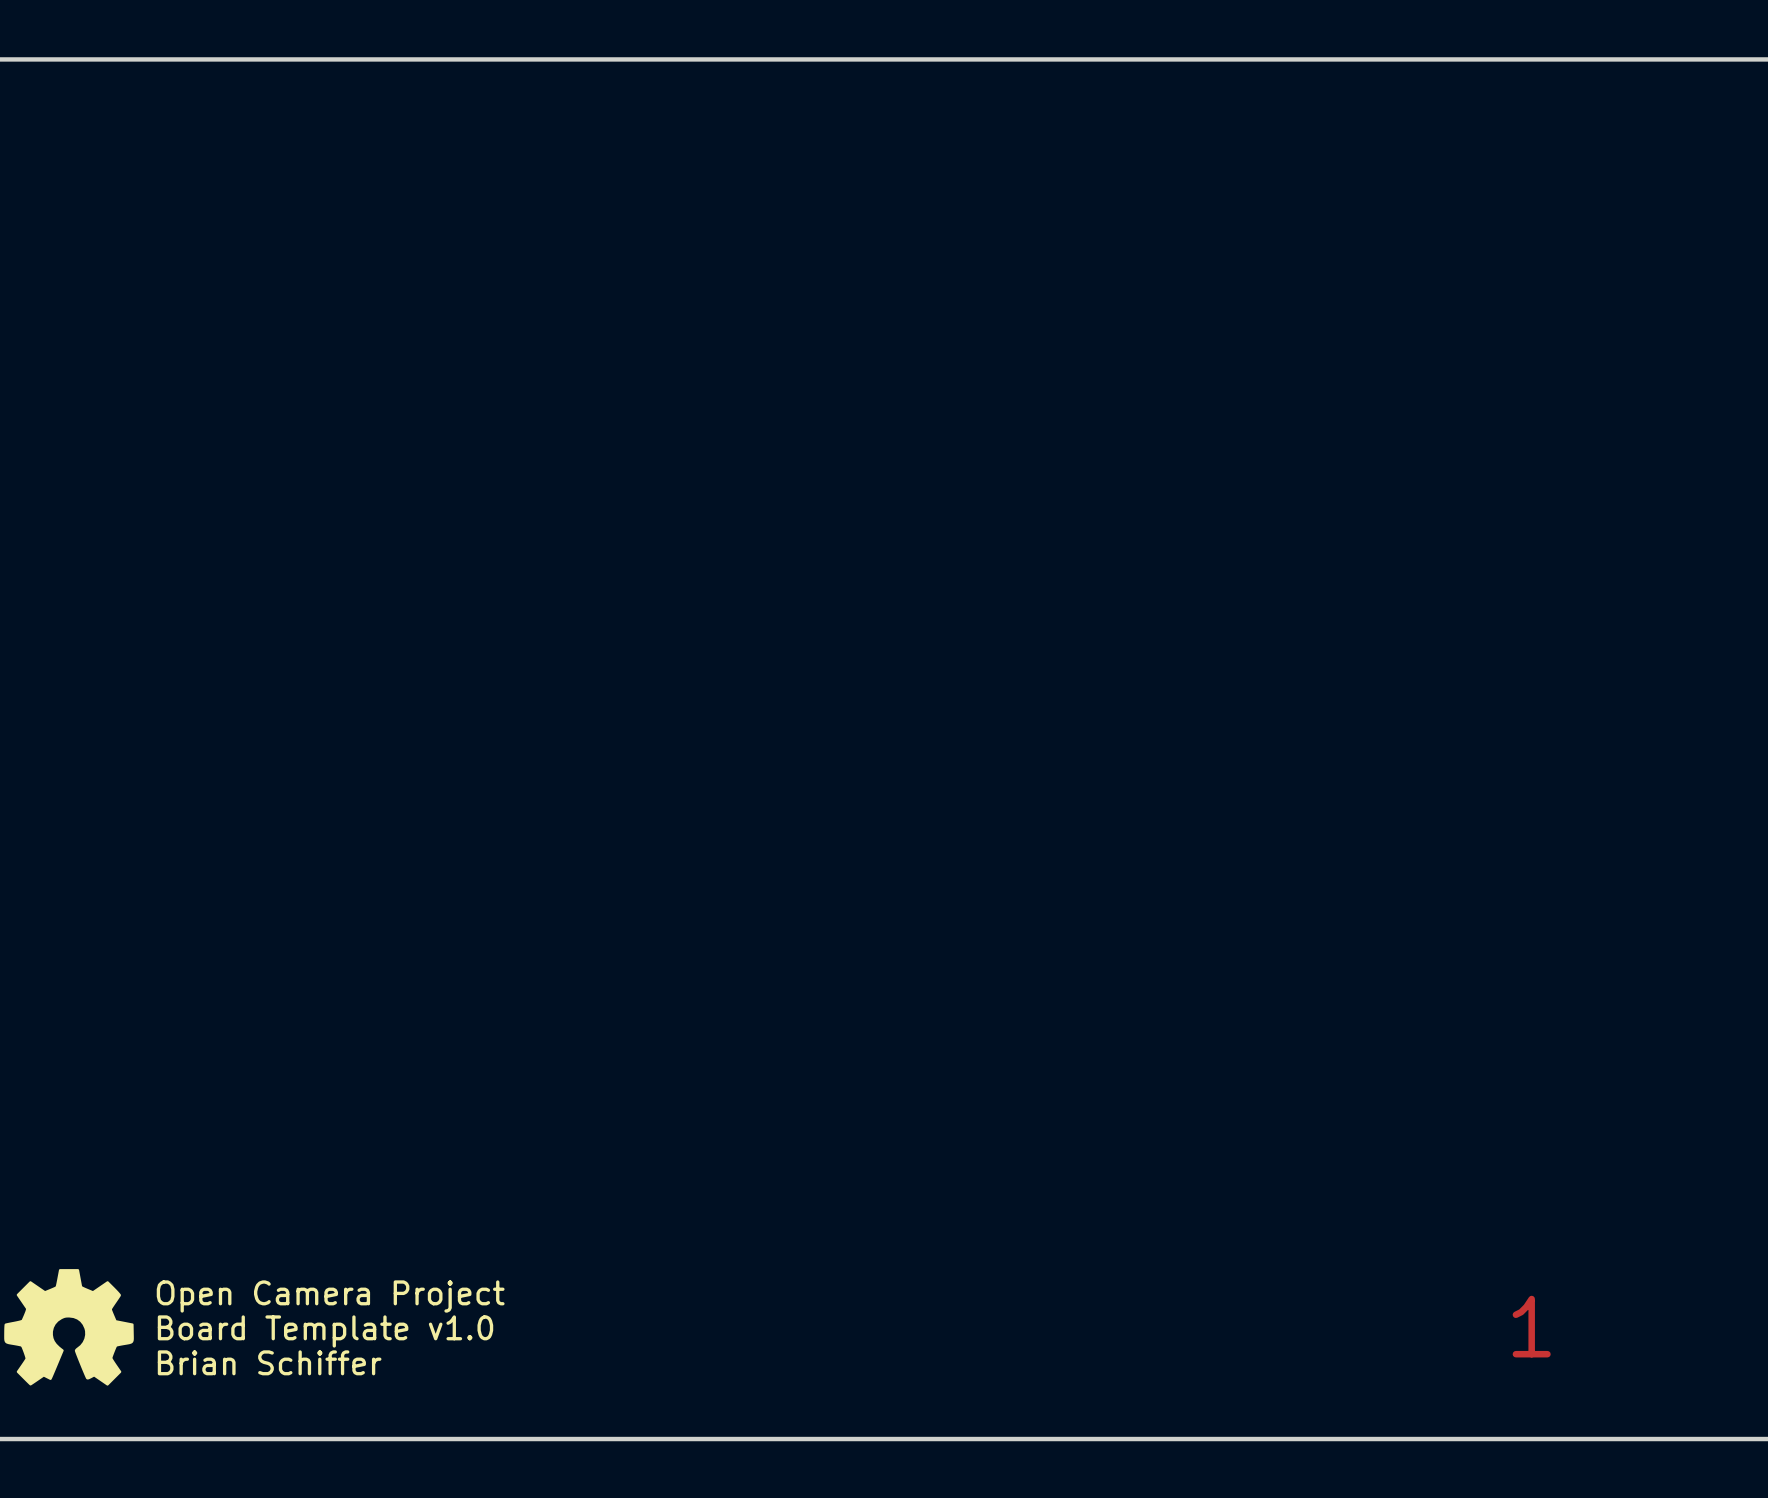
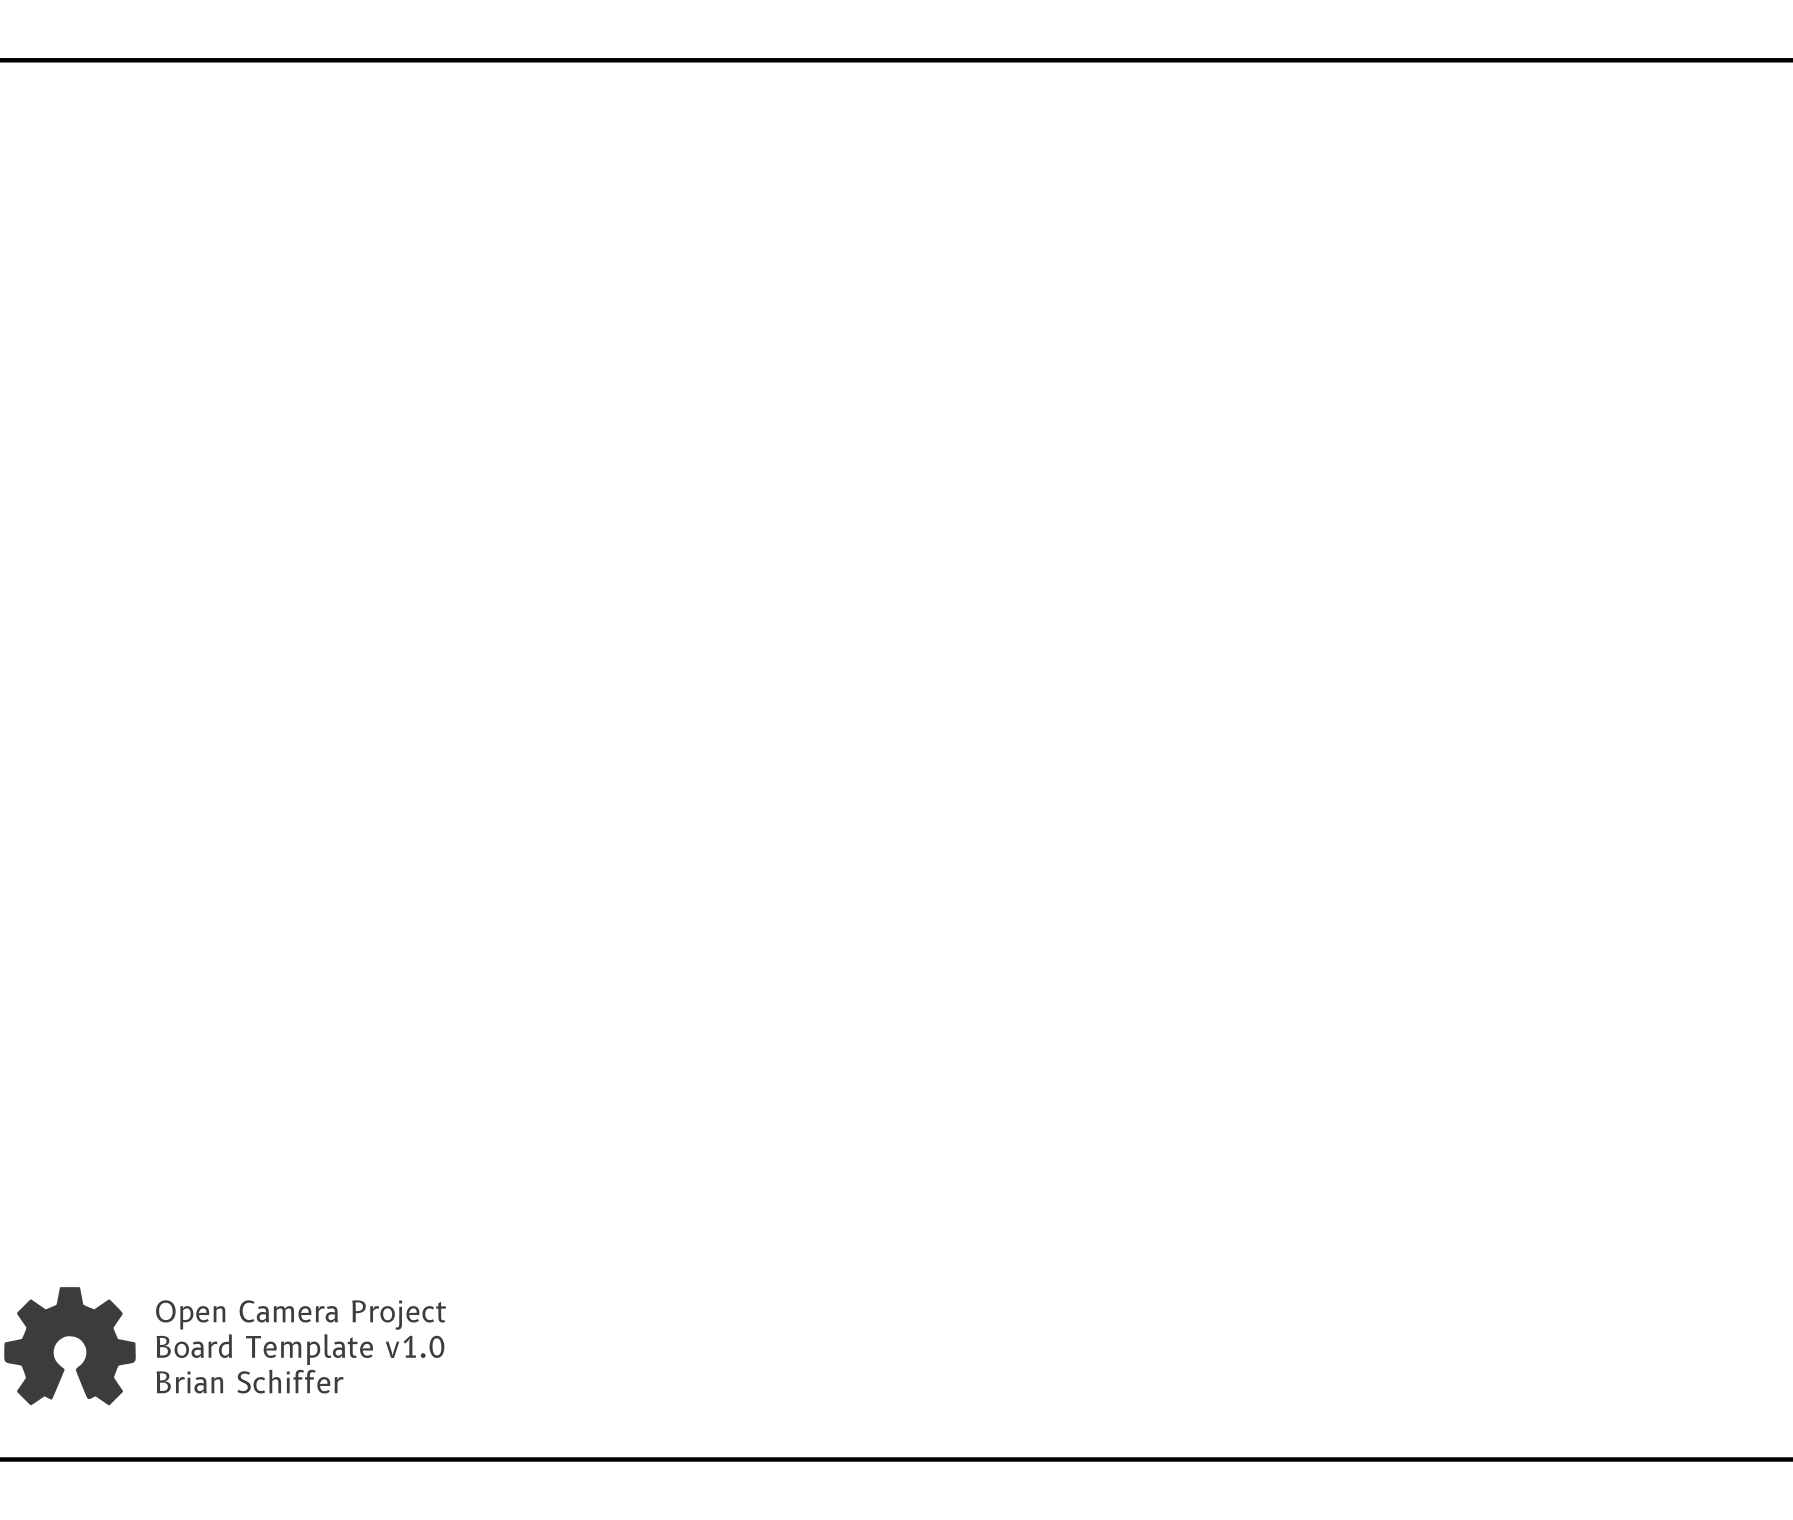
text: 1 (1531, 1326) -> none

